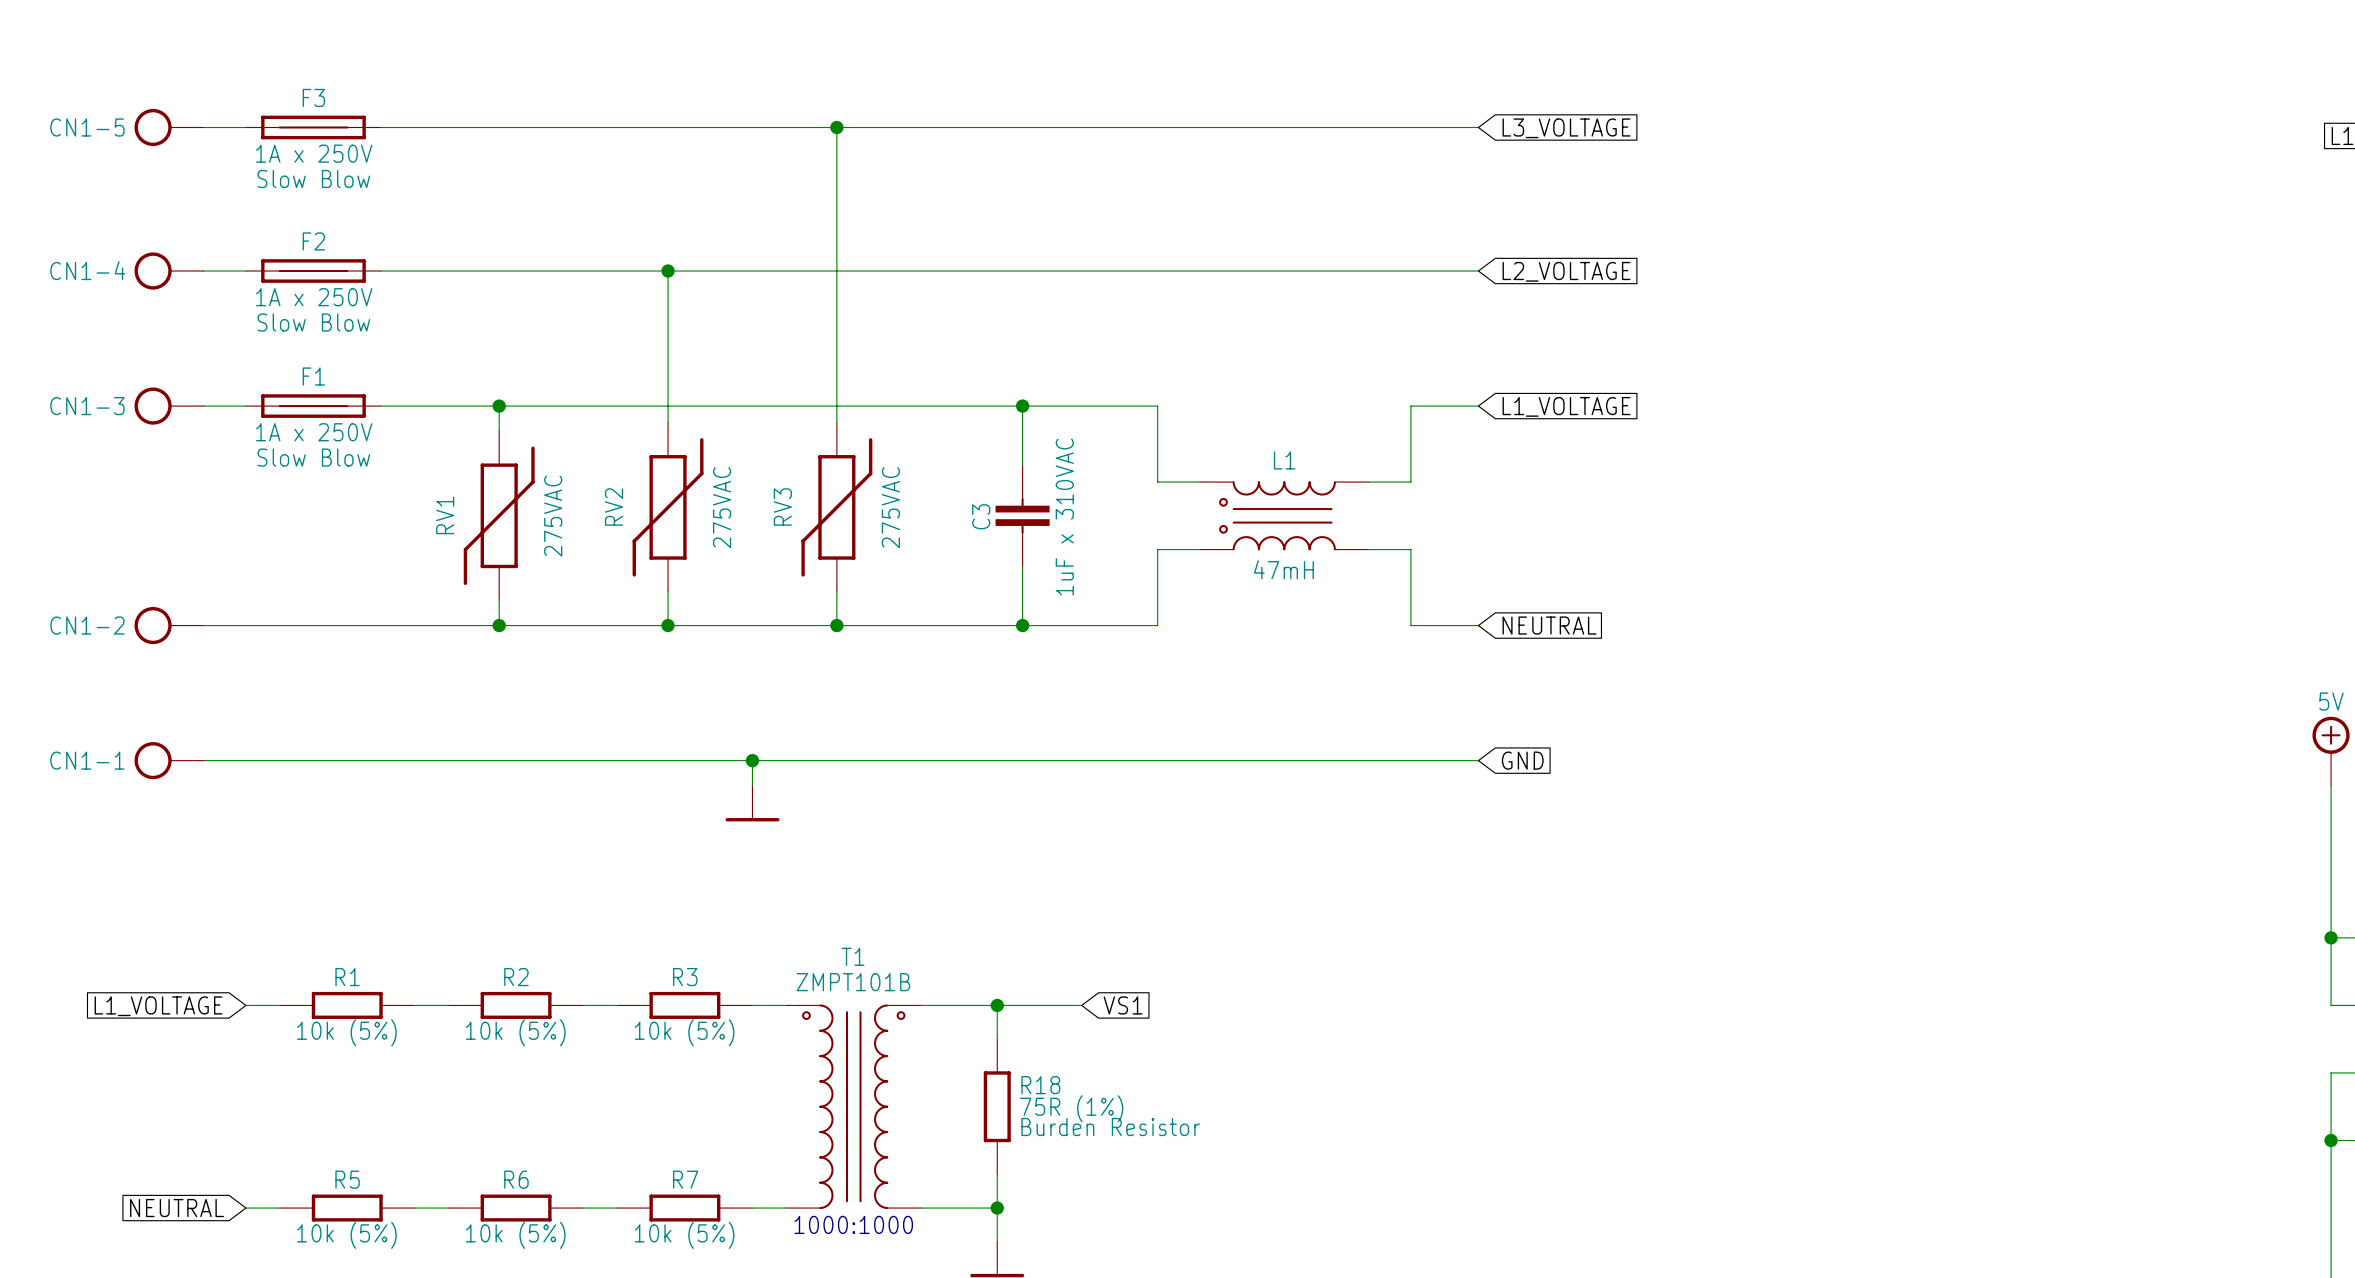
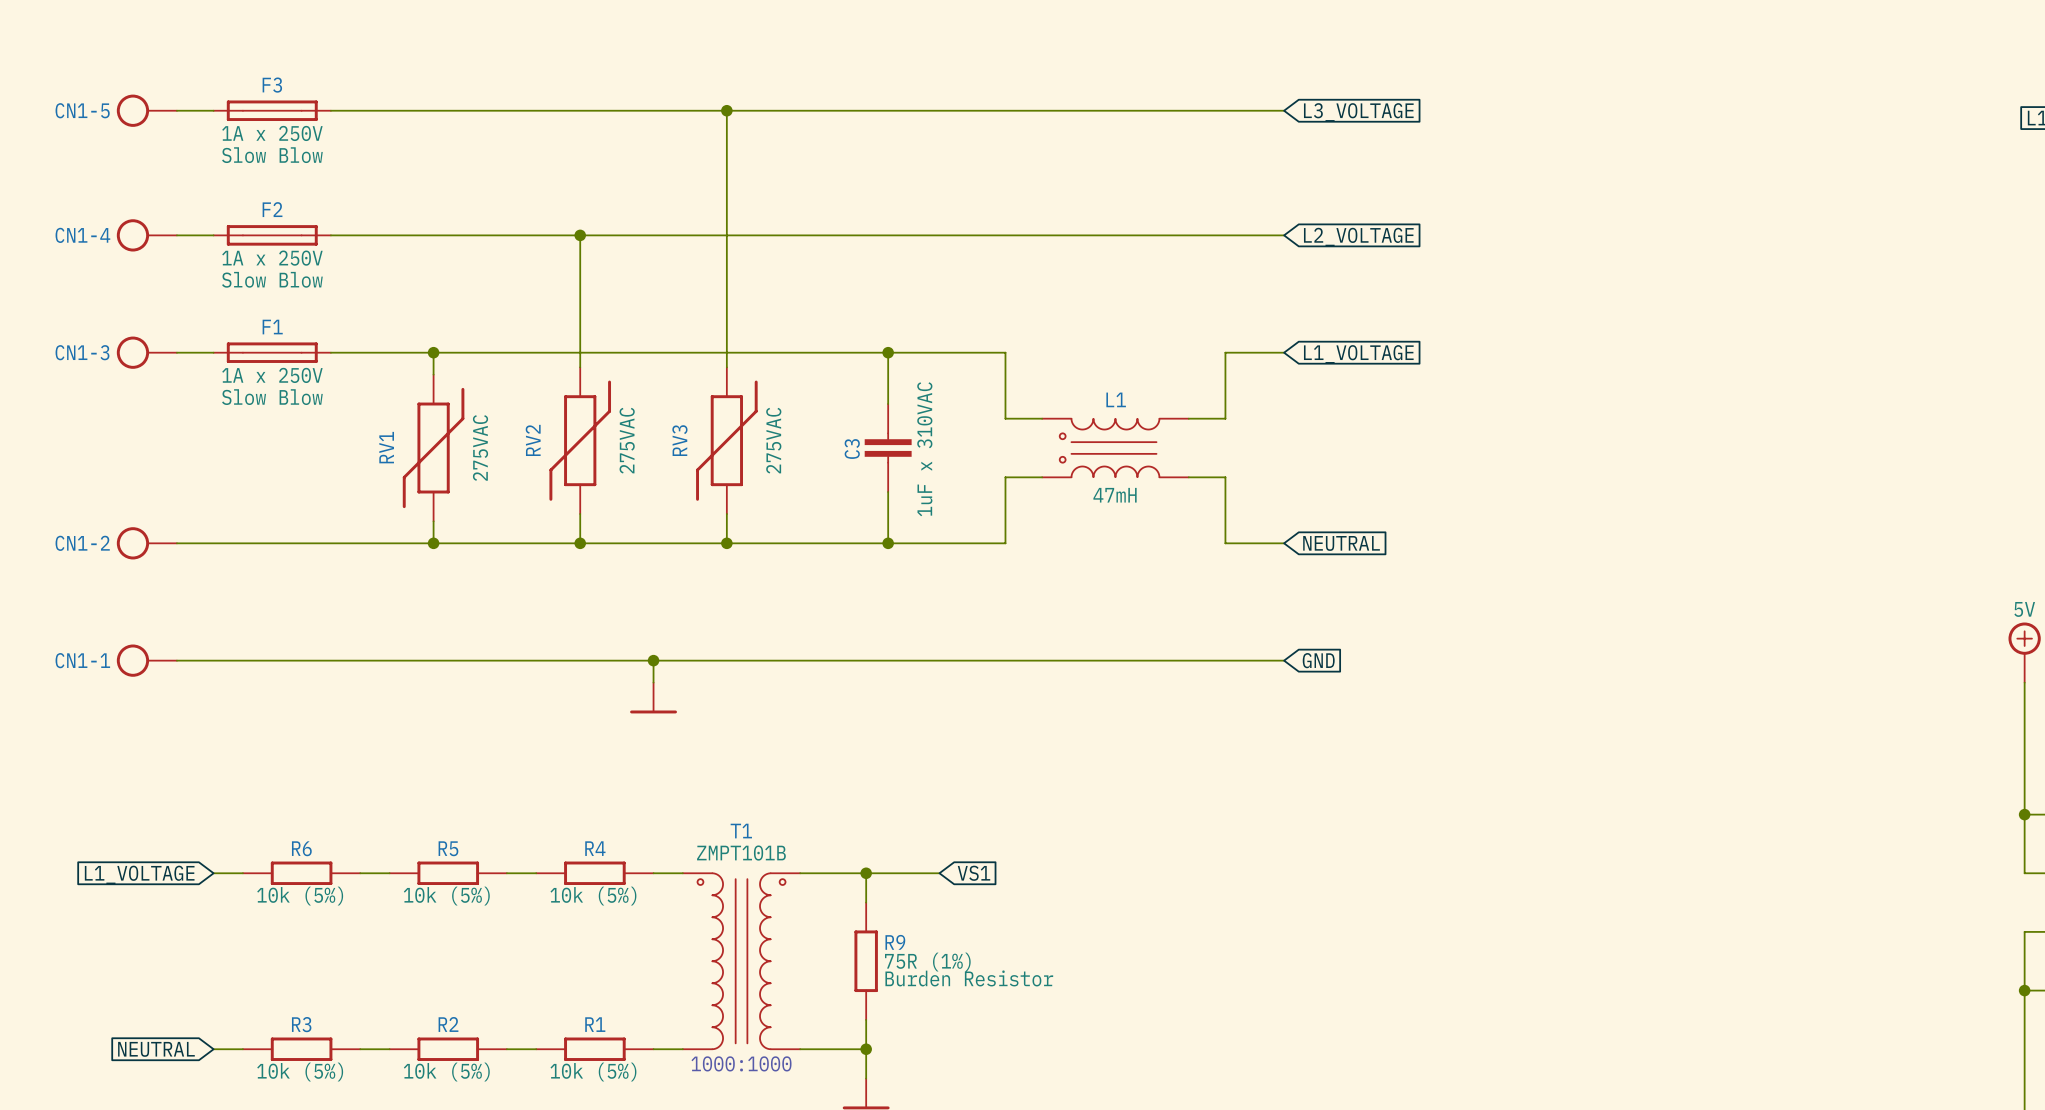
R1 name: R1 (347, 977) -> R6 (301, 848)
R2 name: R2 (516, 977) -> R5 (448, 848)
R3 name: R3 (685, 977) -> R4 (595, 848)
R18 name: R18 (1040, 1085) -> R9 (895, 942)
R5 name: R5 (347, 1179) -> R3 (301, 1024)
R6 name: R6 (516, 1179) -> R2 (448, 1024)
R7 name: R7 (685, 1179) -> R1 (595, 1024)

